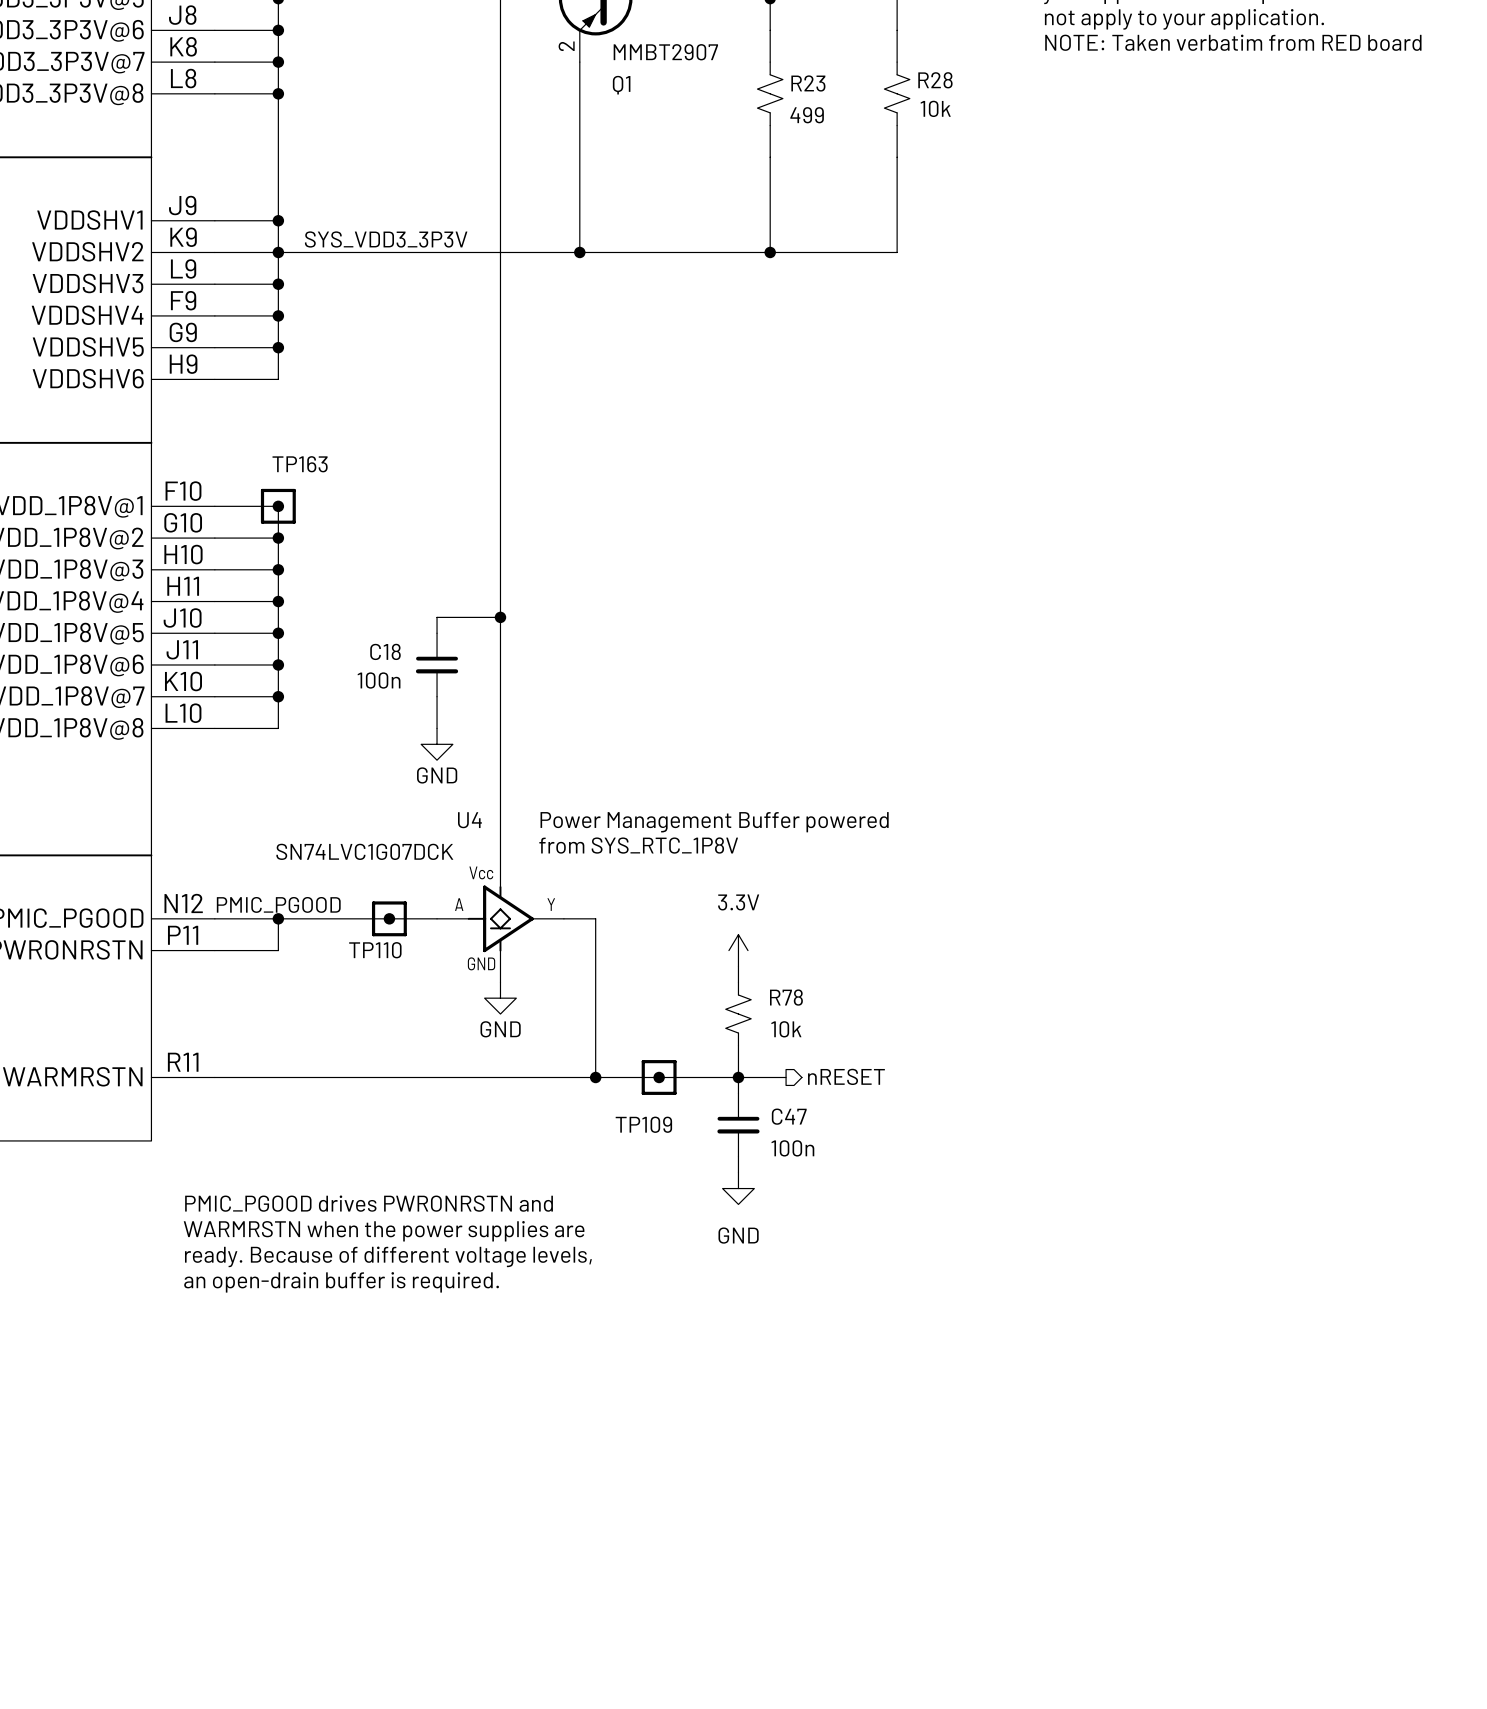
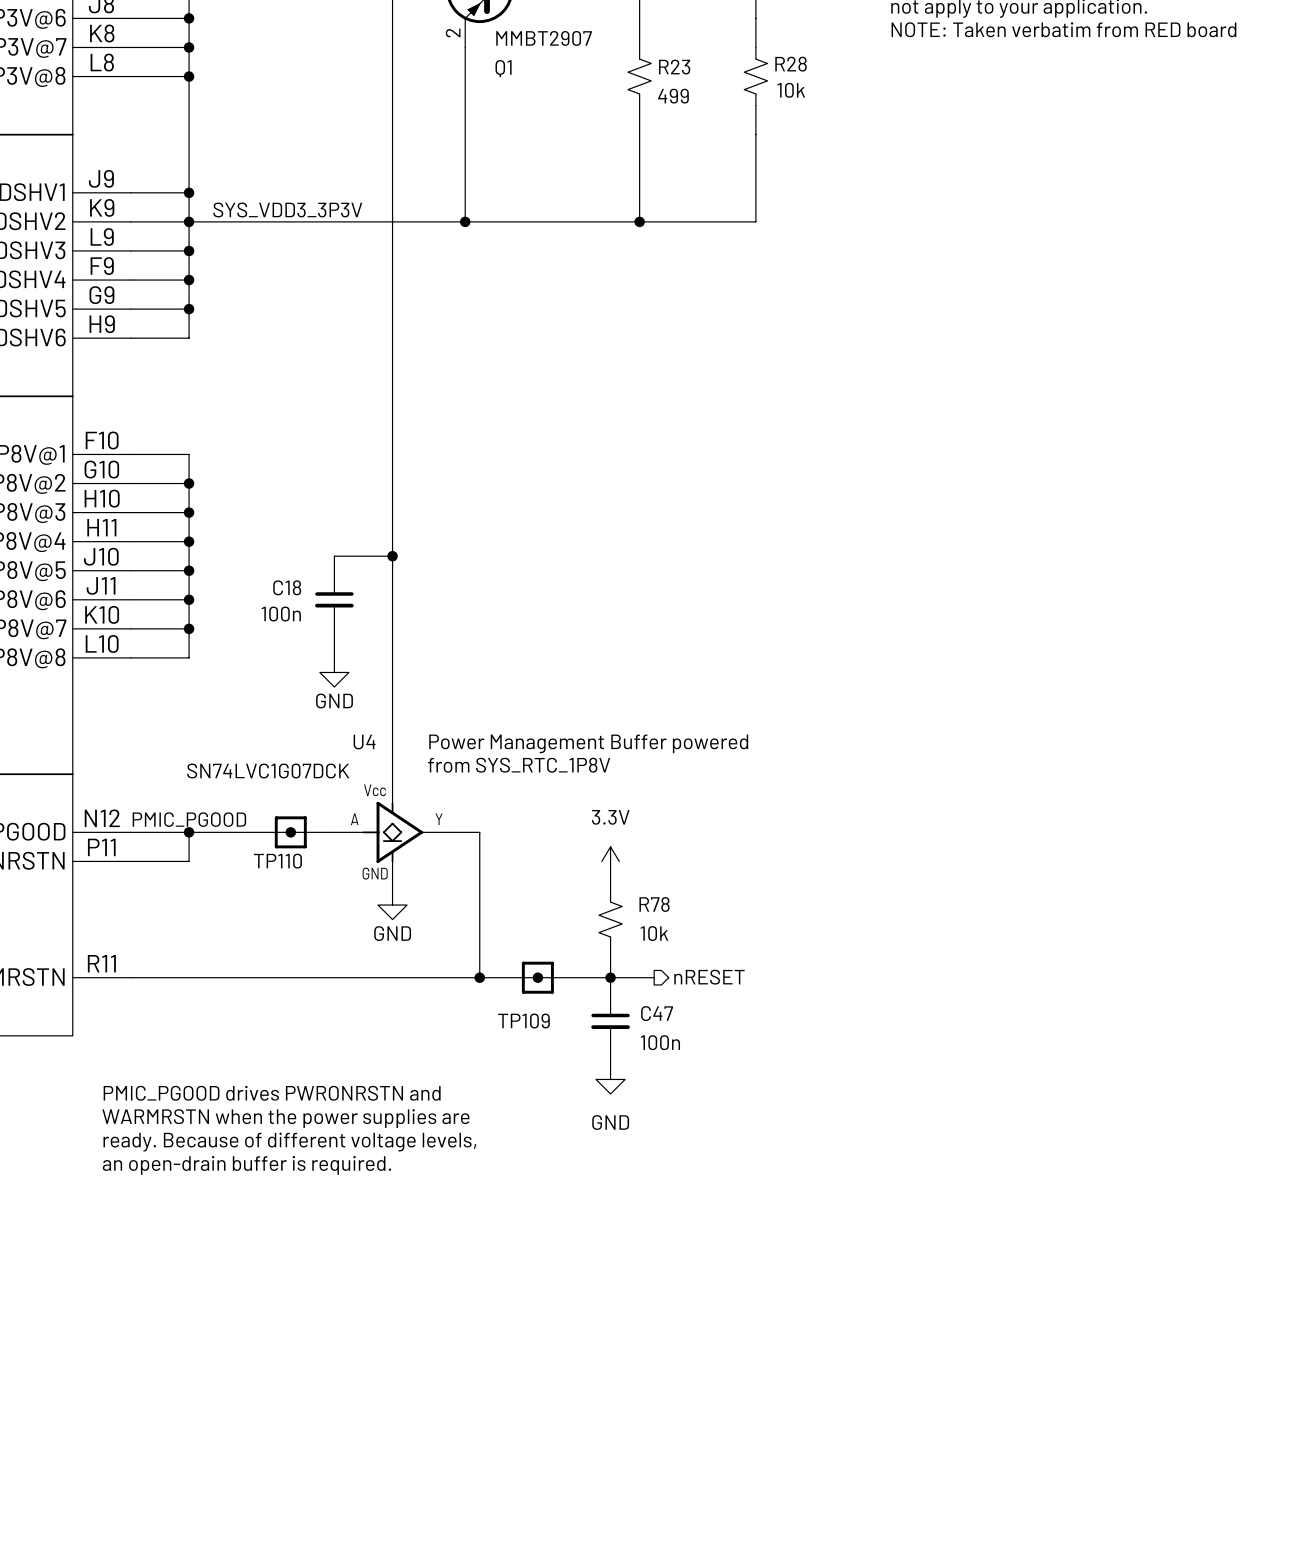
junction: (278, 506) -> none
TP163: (278, 506) -> none

